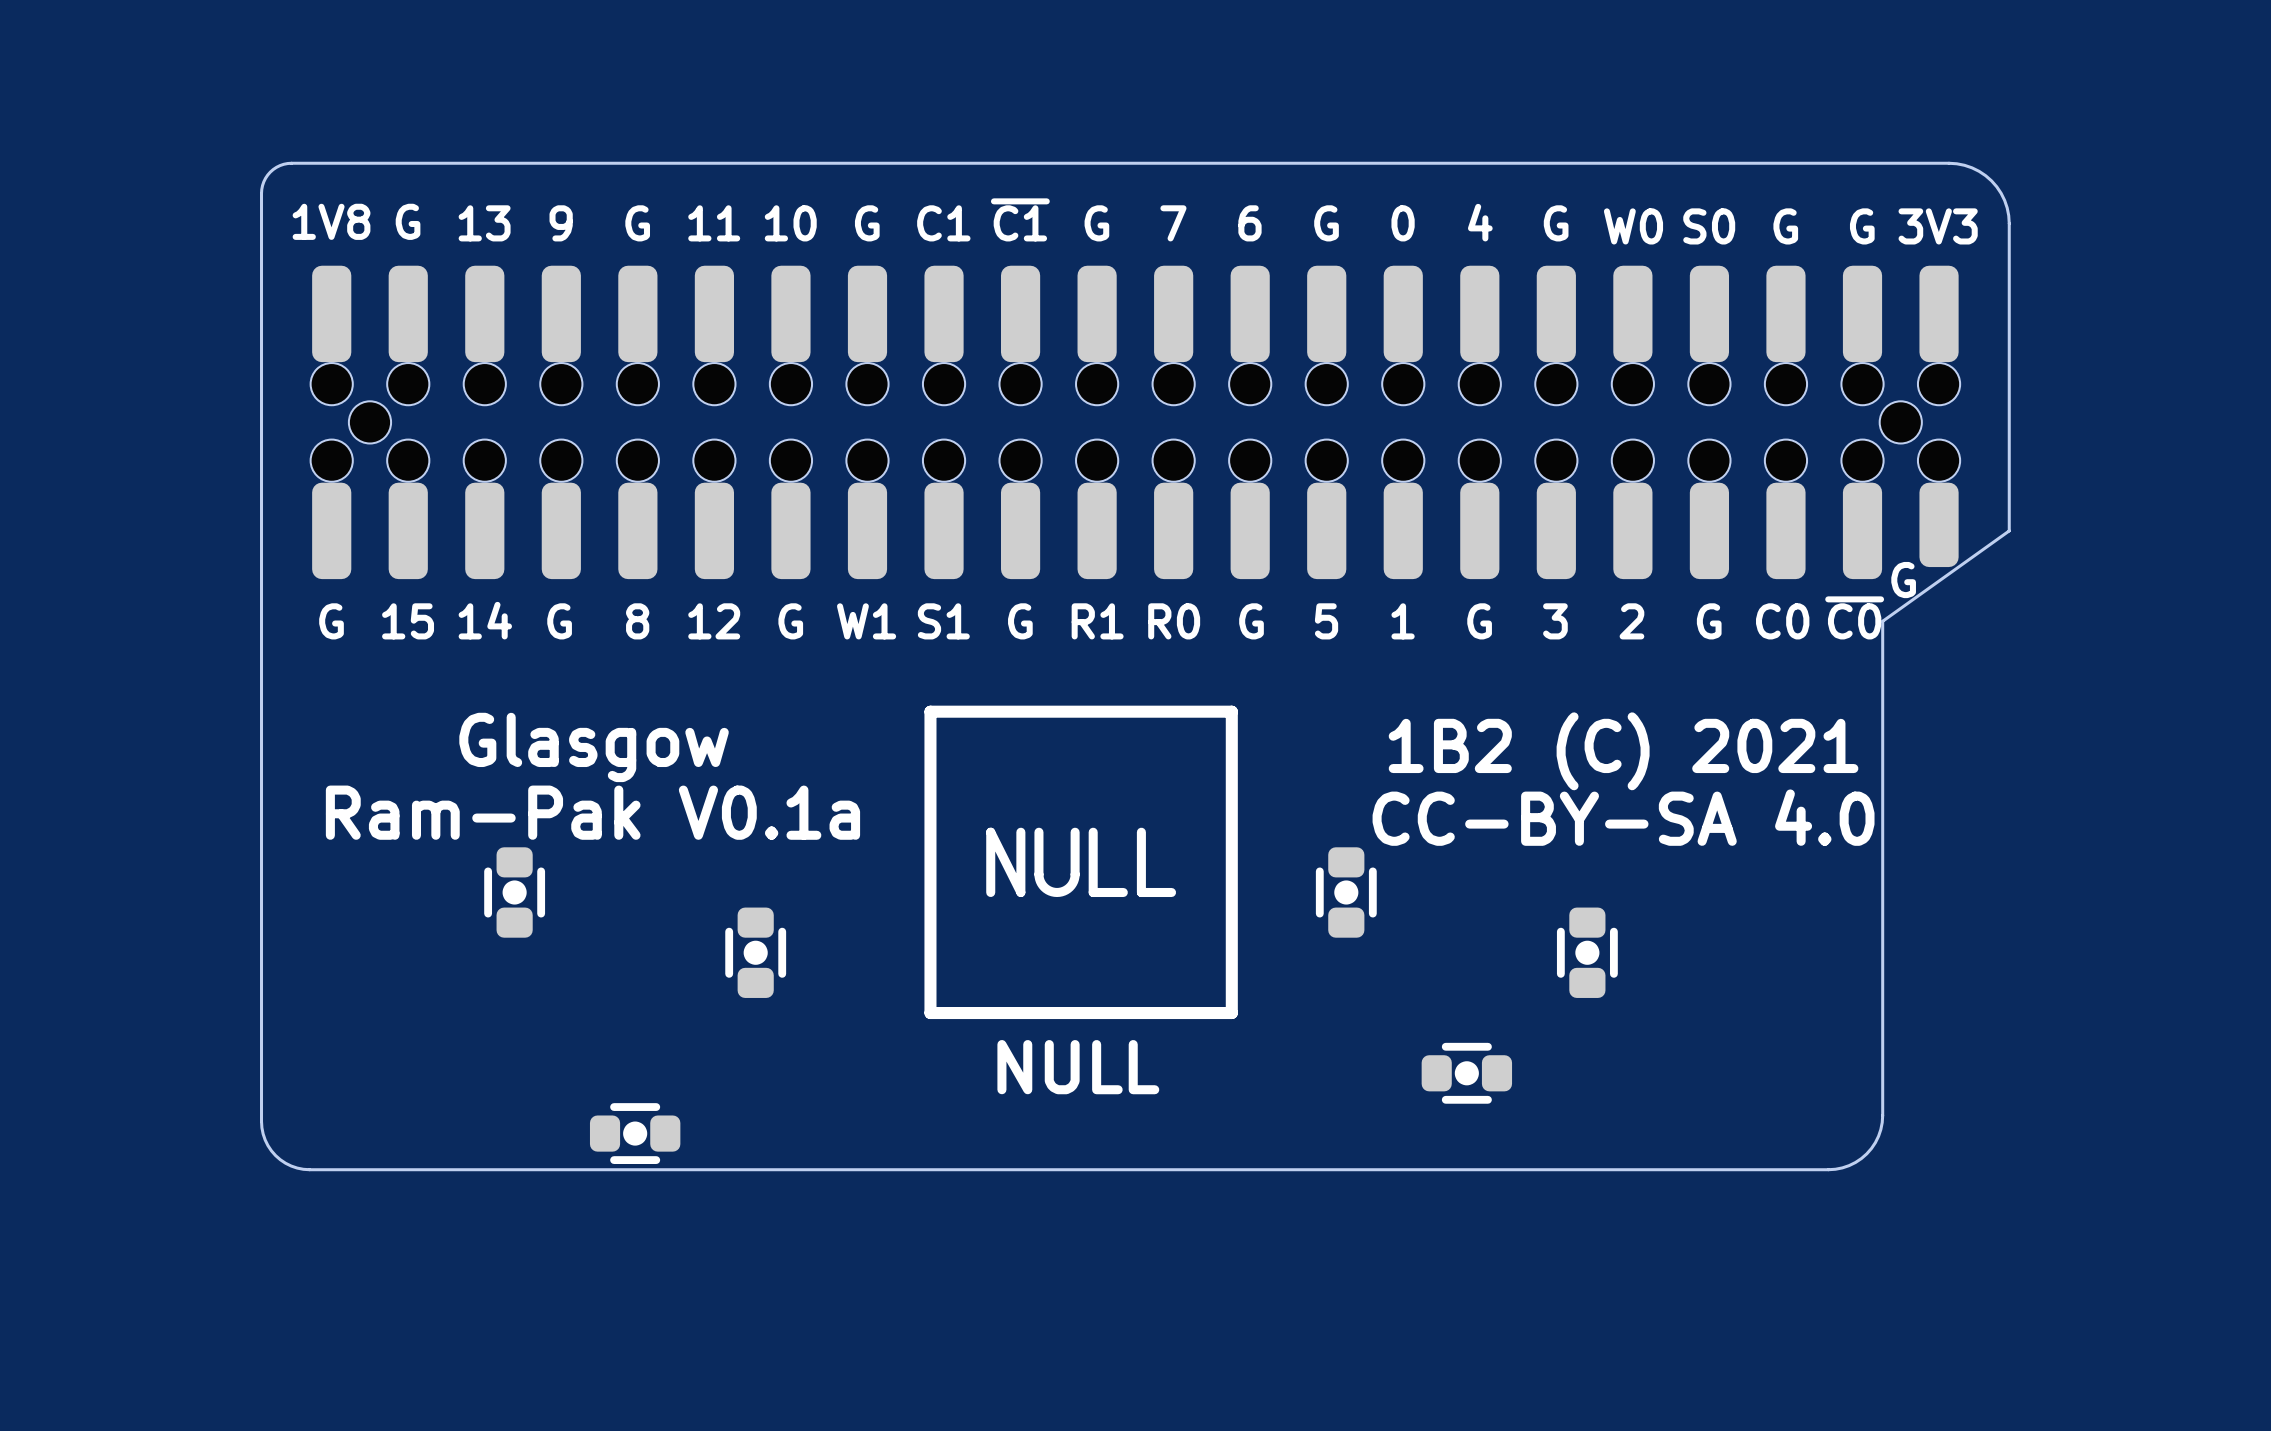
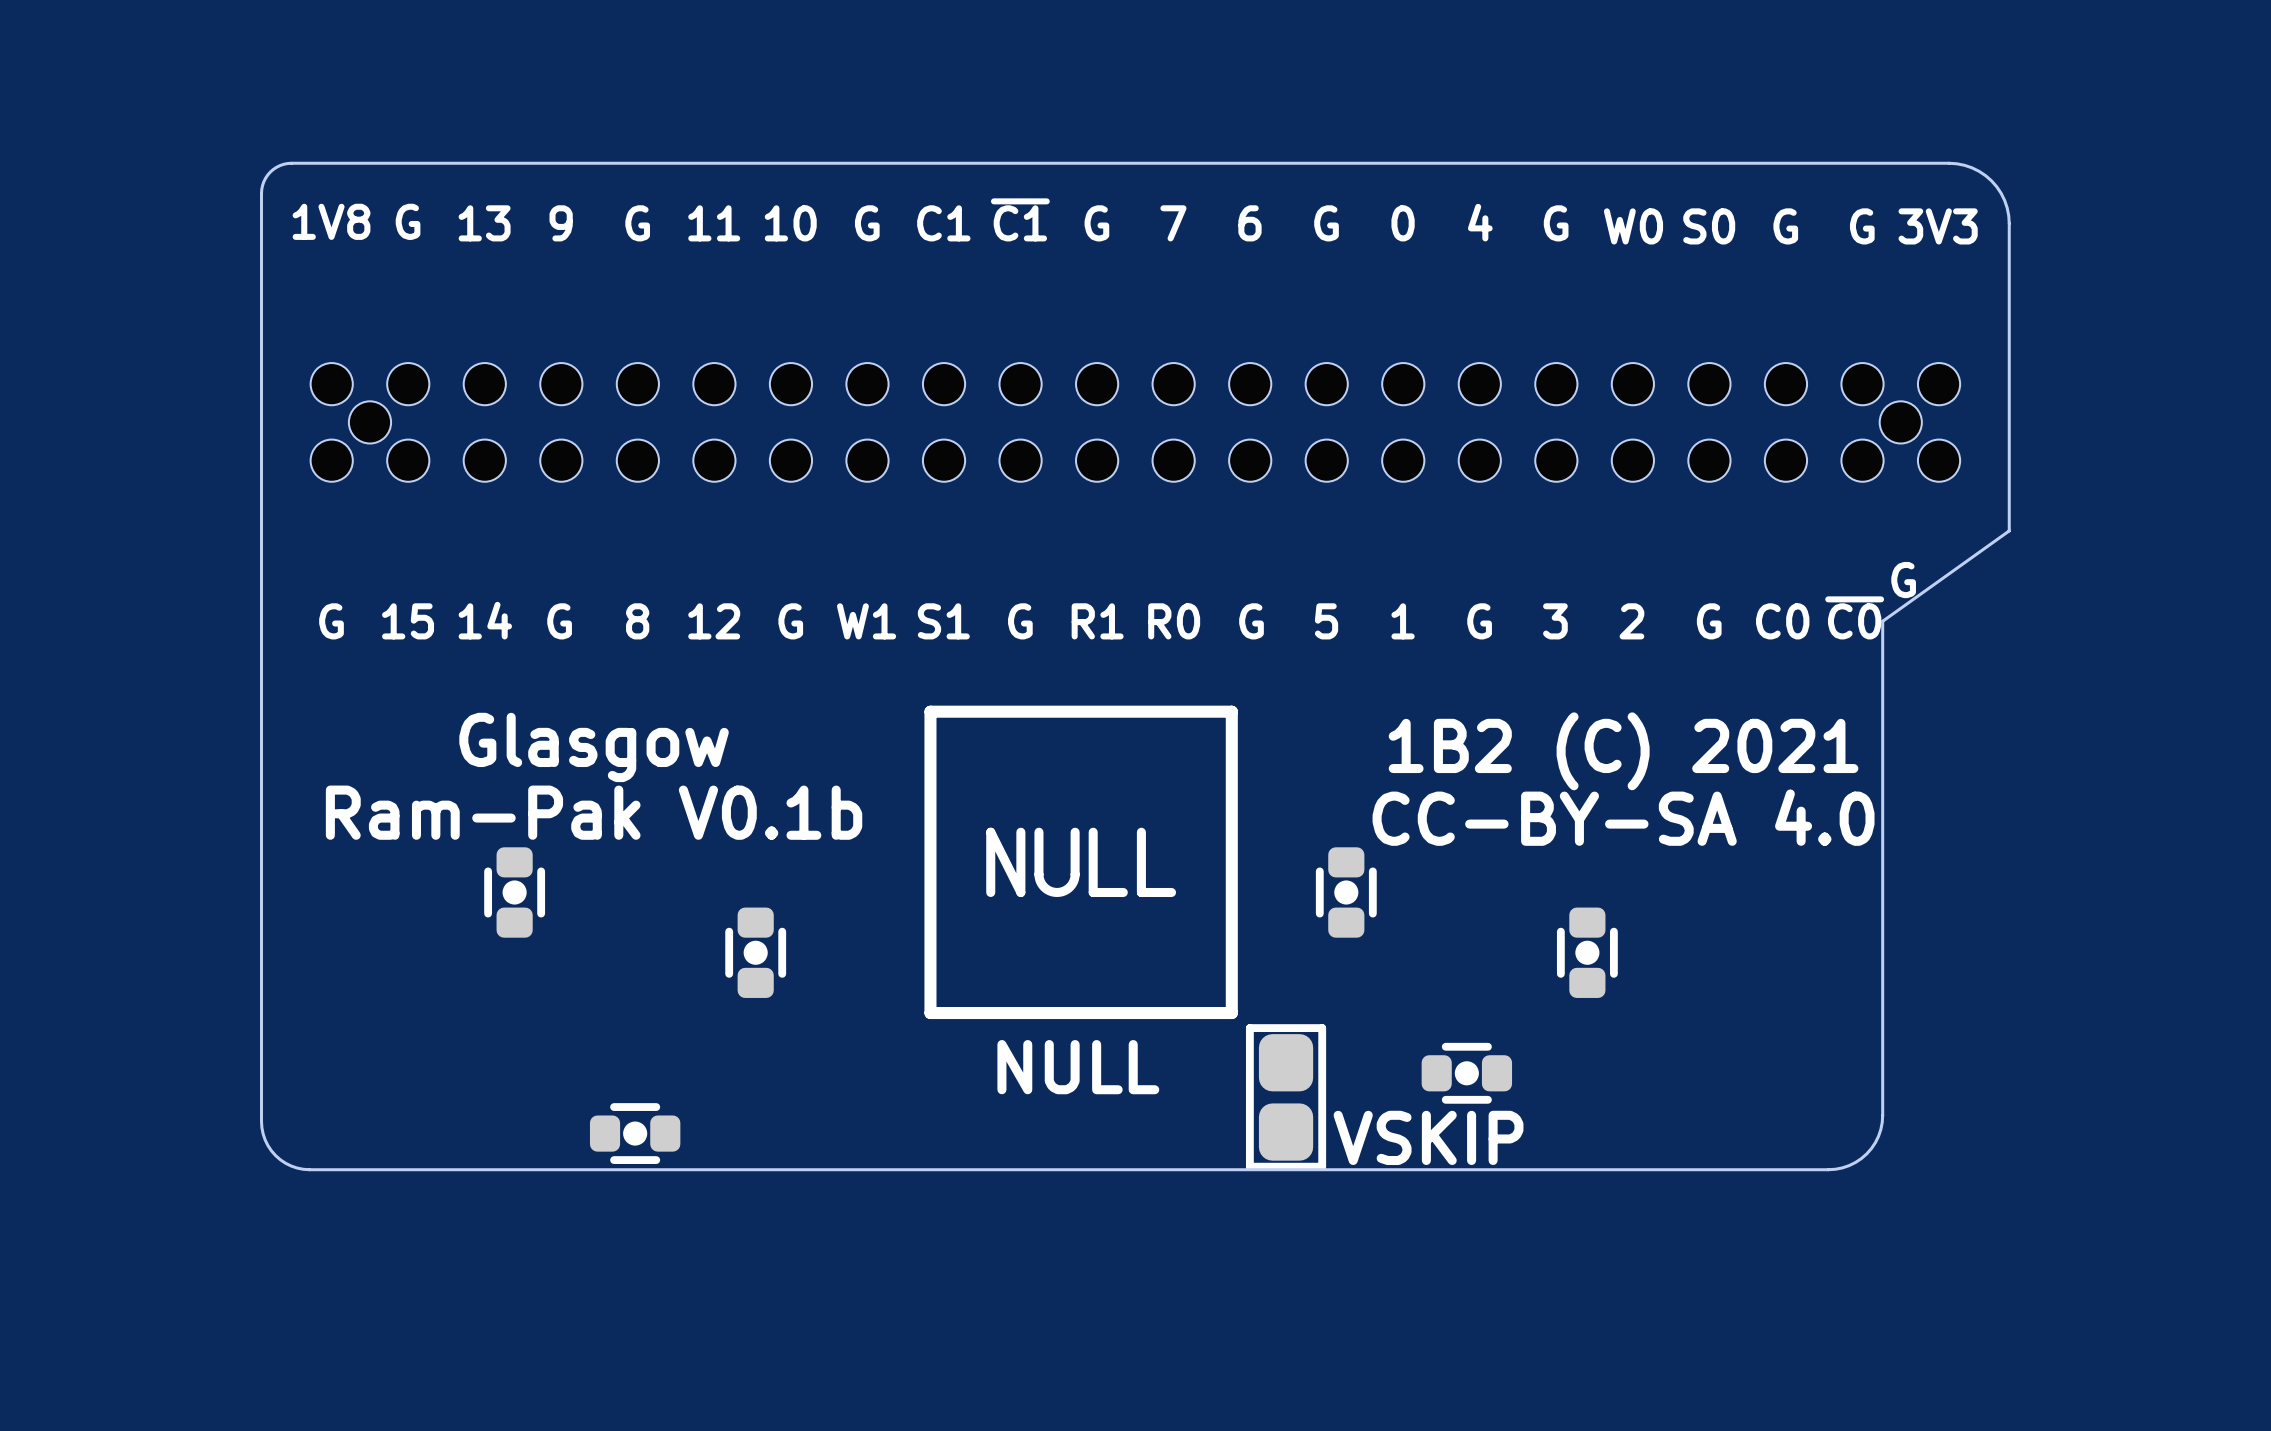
part footprint: [310, 265, 1961, 580] -> [310, 363, 1961, 482]
text: Ram-Pak V0.1a (592, 812) -> Ram-Pak V0.1b (594, 812)
part: none -> (1286, 1097)
text: none -> VSKIP (1428, 1137)

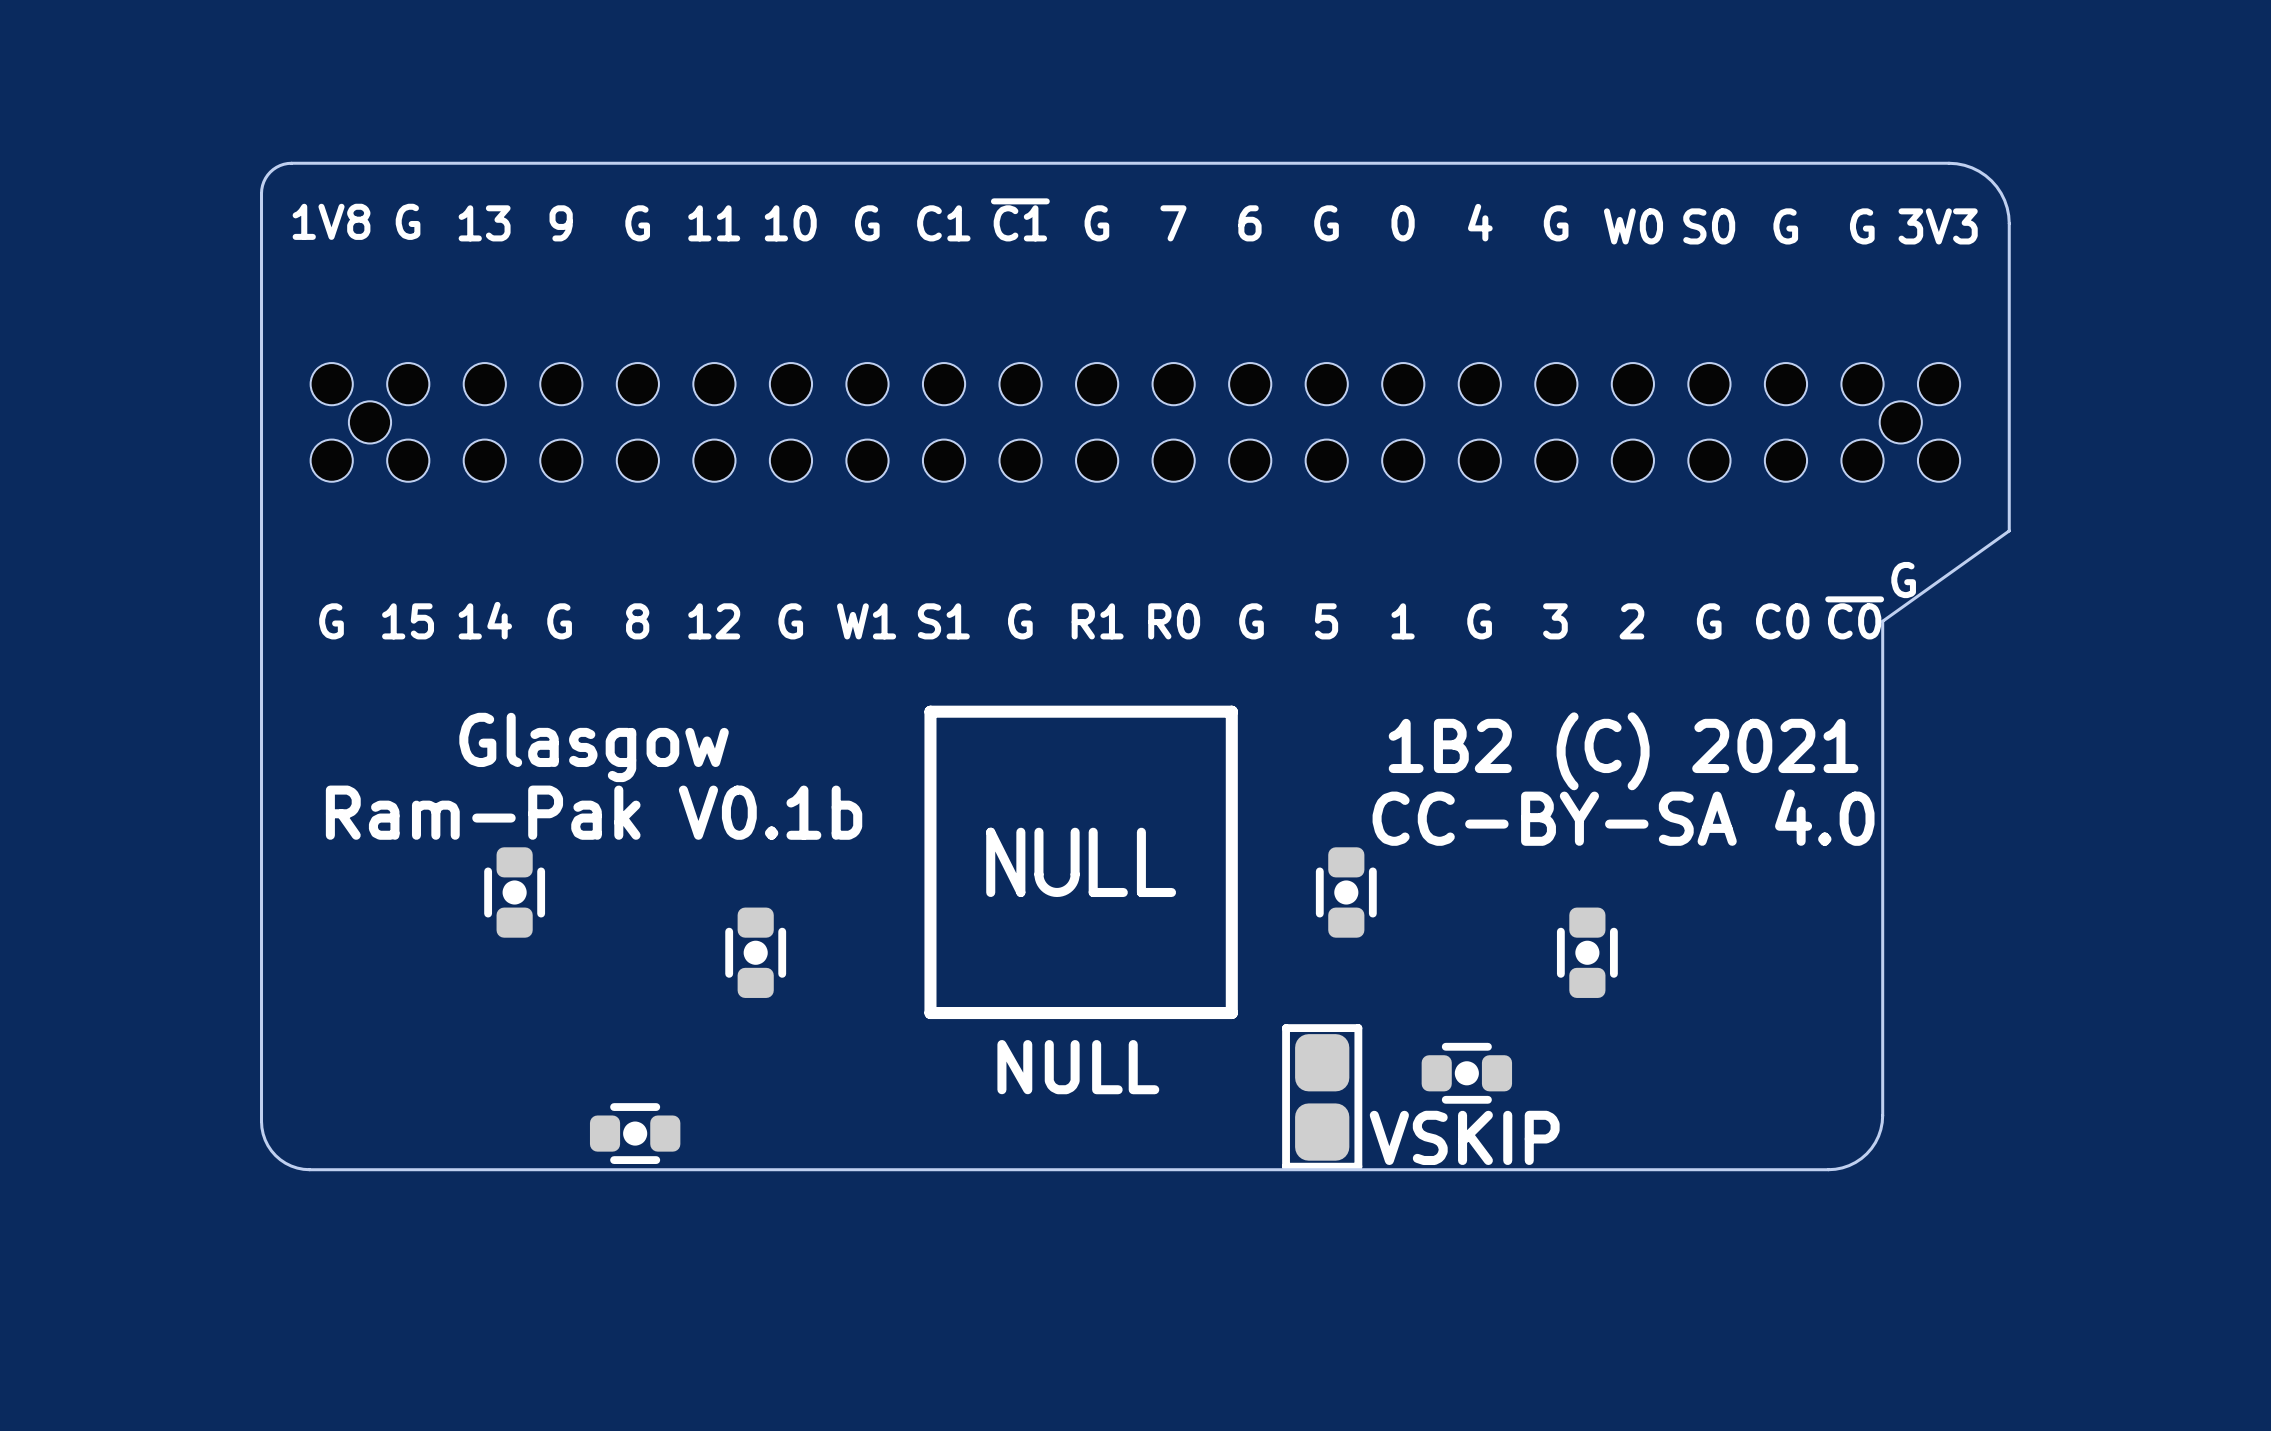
part position: (1286, 1097) -> (1322, 1097)
text position: VSKIP (1428, 1137) -> VSKIP (1464, 1137)

